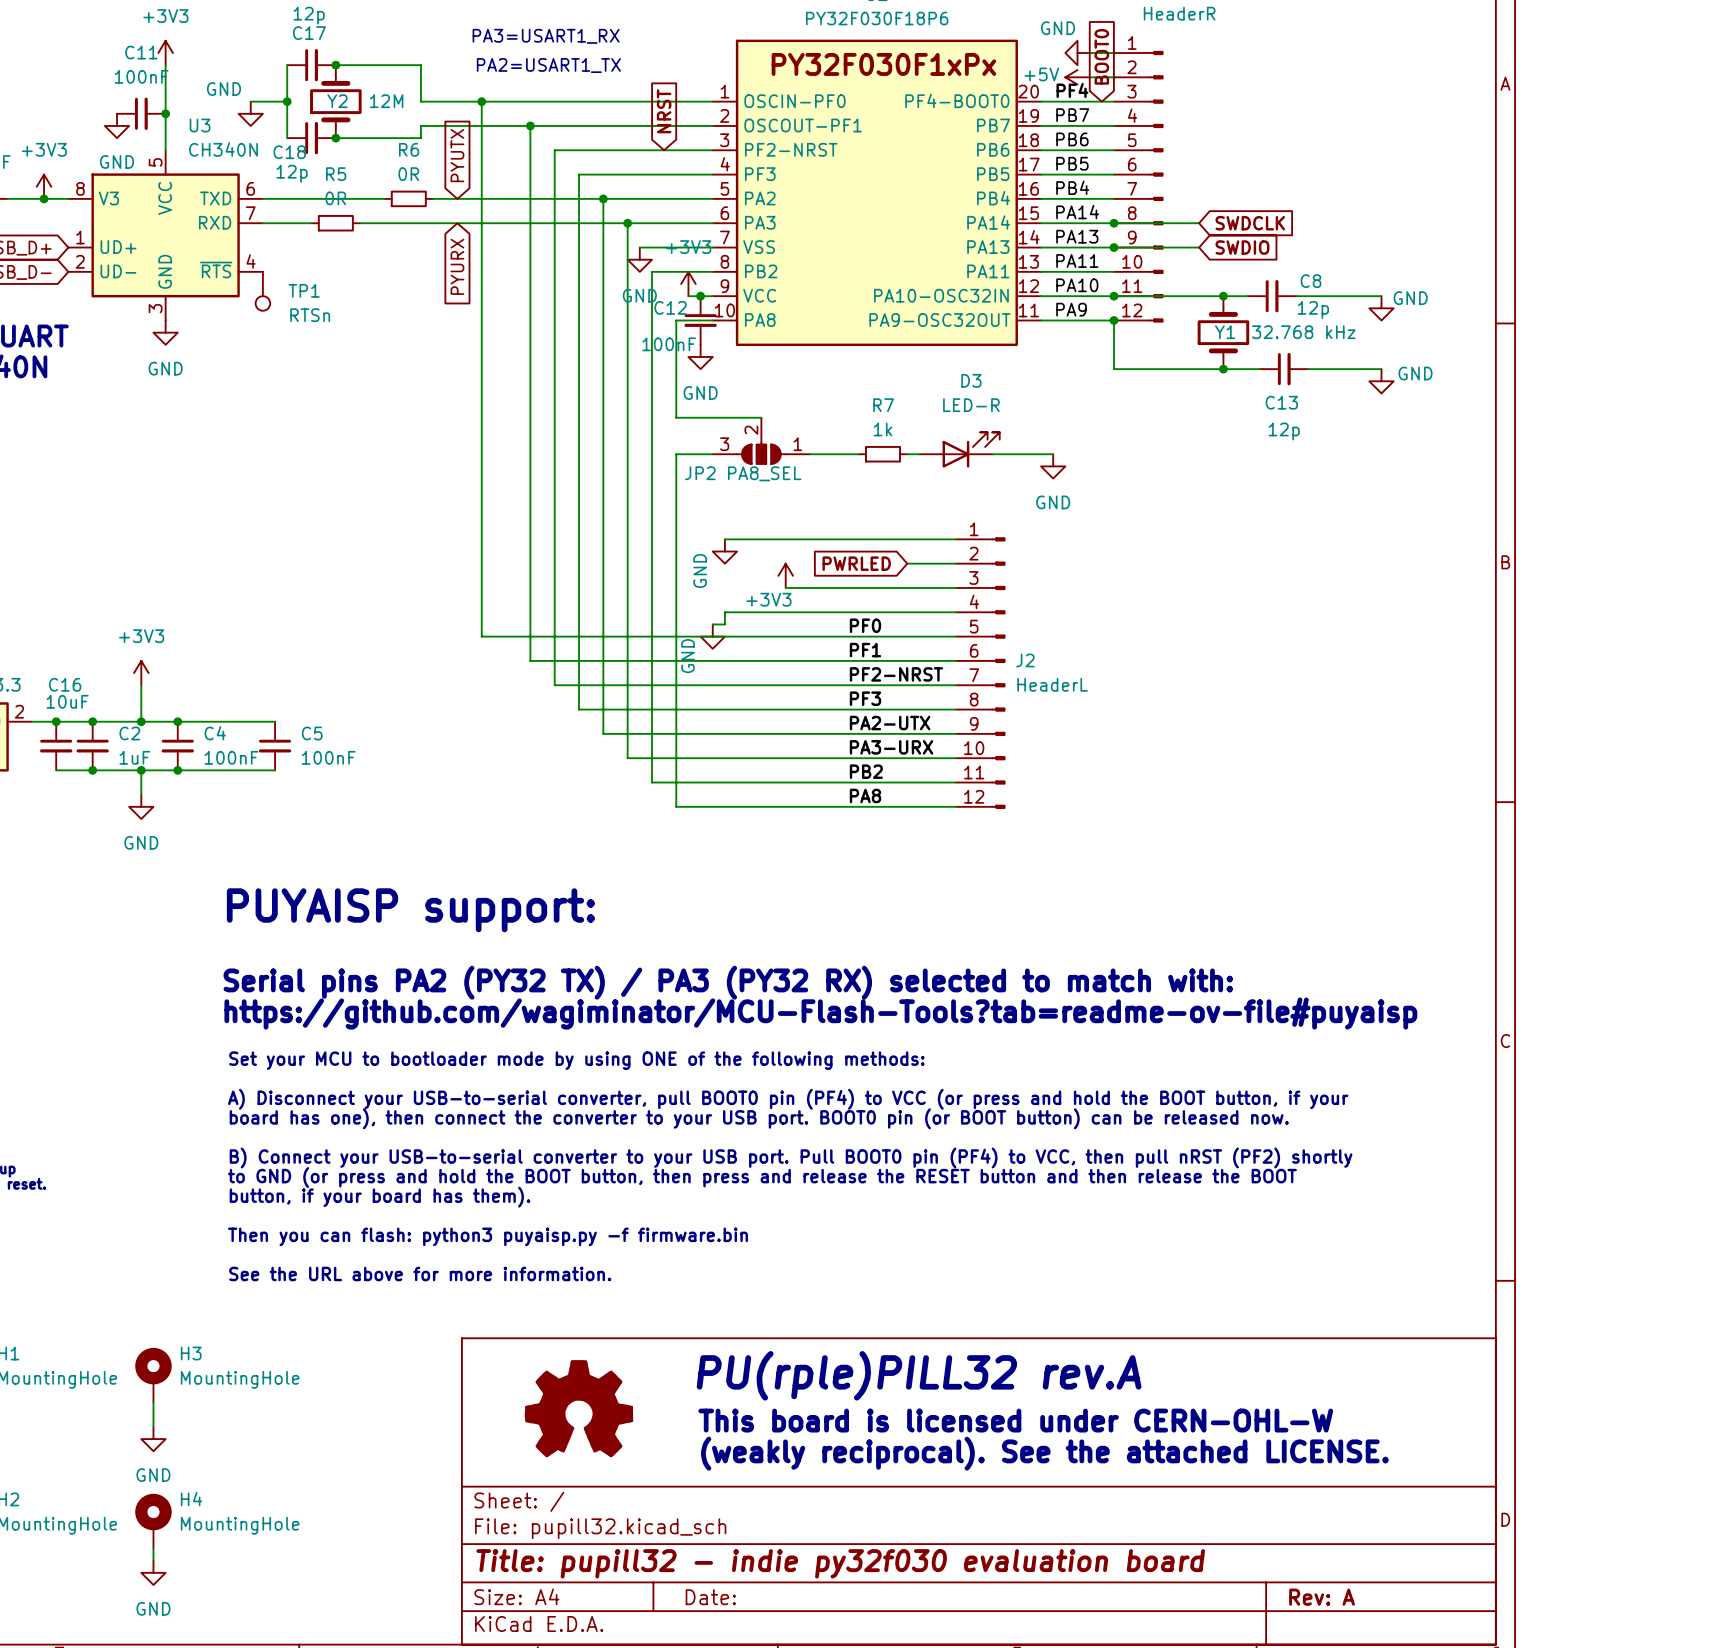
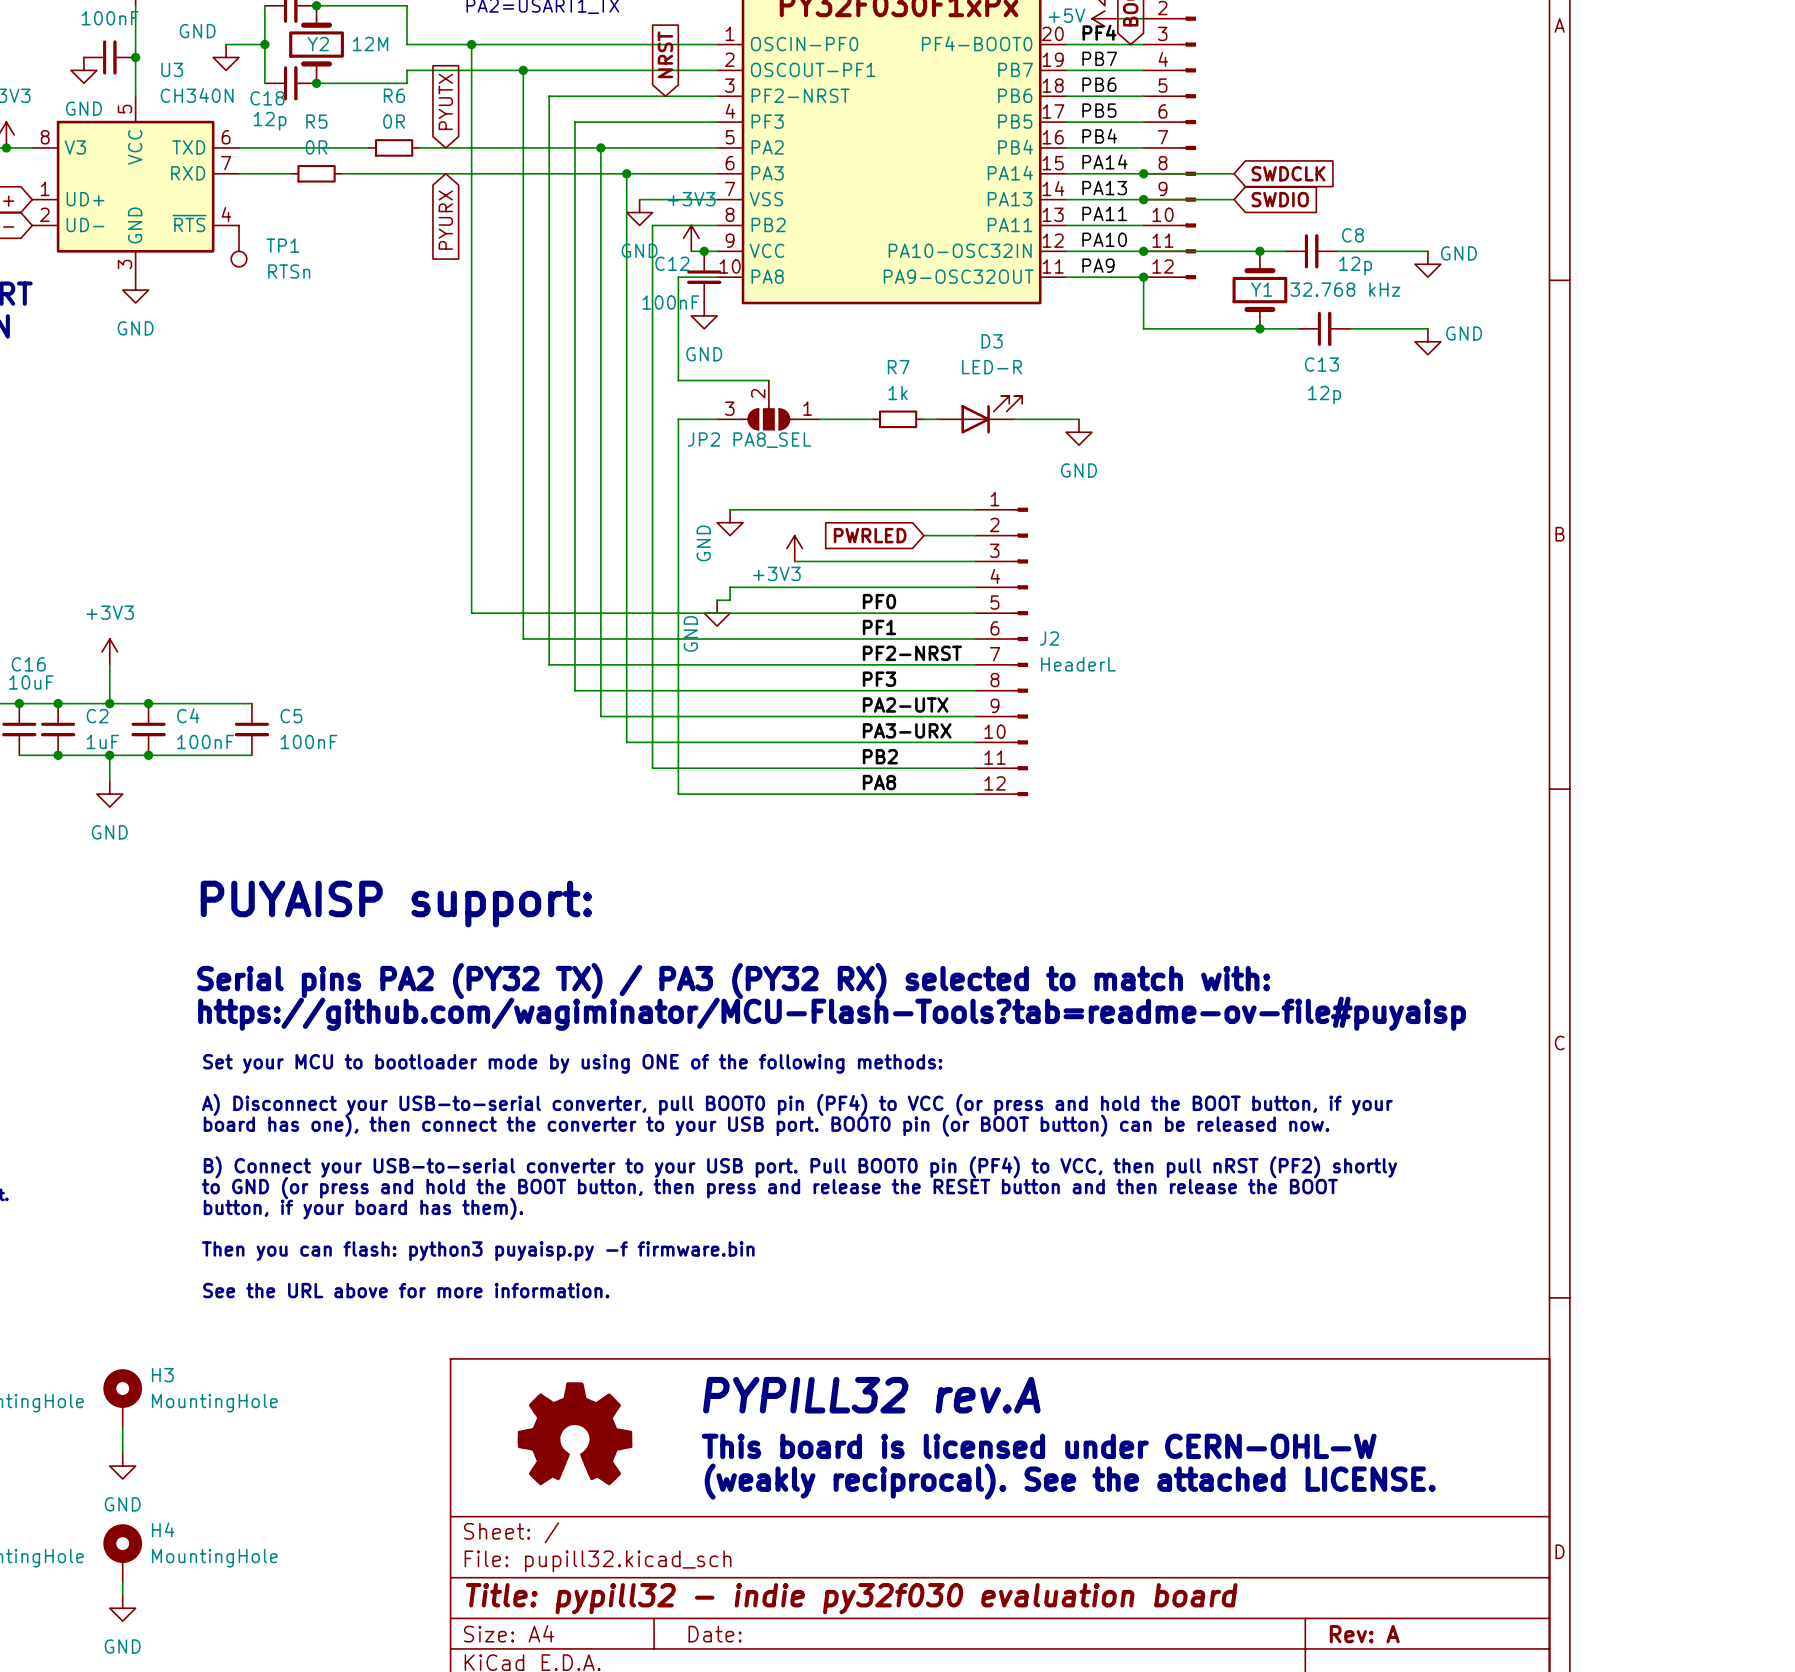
text: PU(rple)PILL32 rev.A (919, 1375) -> PYPILL32 rev.A (871, 1395)
title block: Title: pupill32 - indie py32f030 evaluation board (840, 1563) -> Title: pypill32 - indie py32f030 evaluation board (851, 1598)

